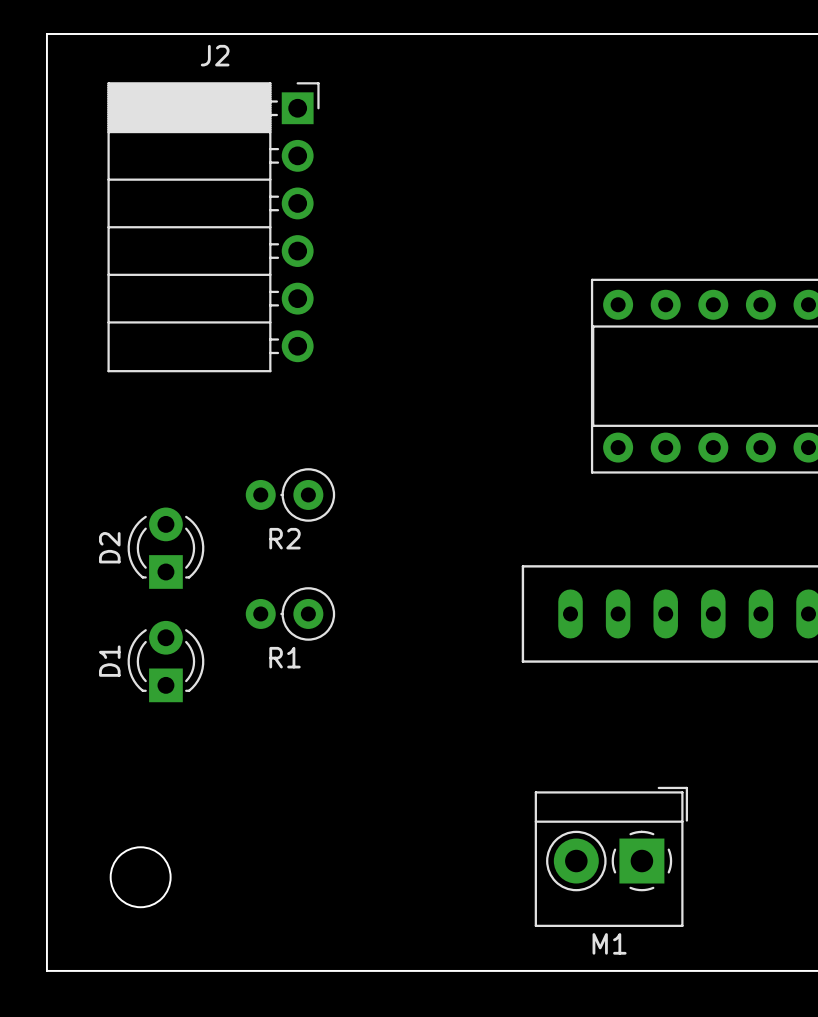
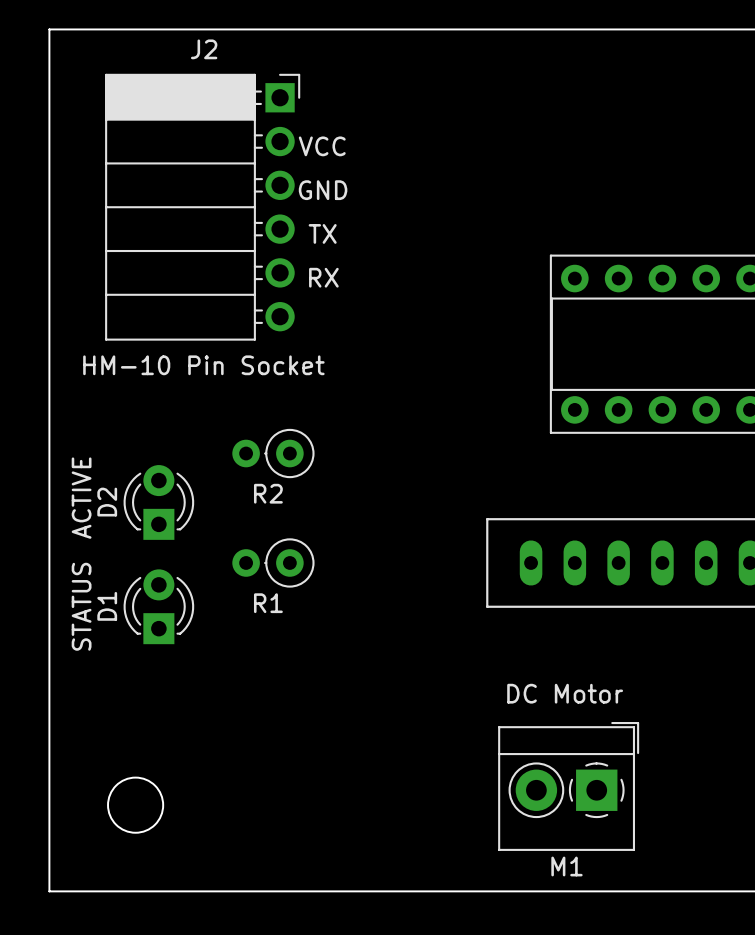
text: none -> VCC (322, 146)
text: none -> GND (323, 190)
text: none -> TX (322, 233)
text: none -> RX (323, 277)
text: none -> HM-10 Pin Socket (203, 365)
text: none -> ACTIVE (81, 498)
text: none -> STATUS (81, 606)
text: none -> DC Motor (565, 693)

